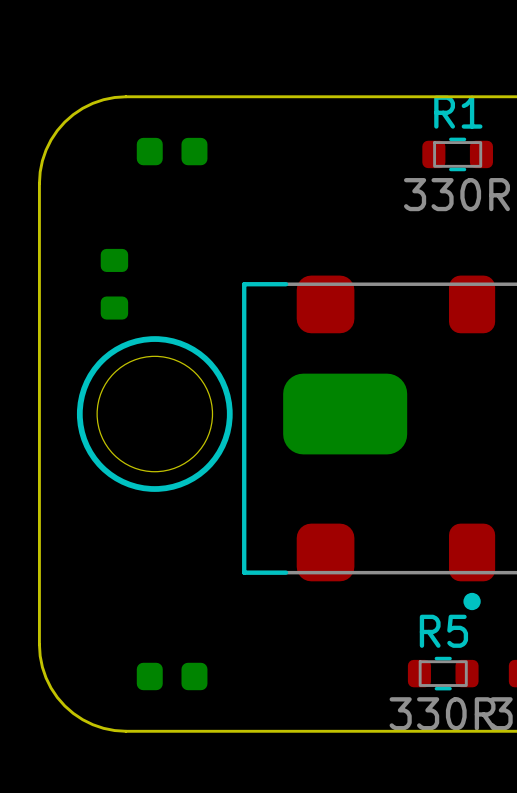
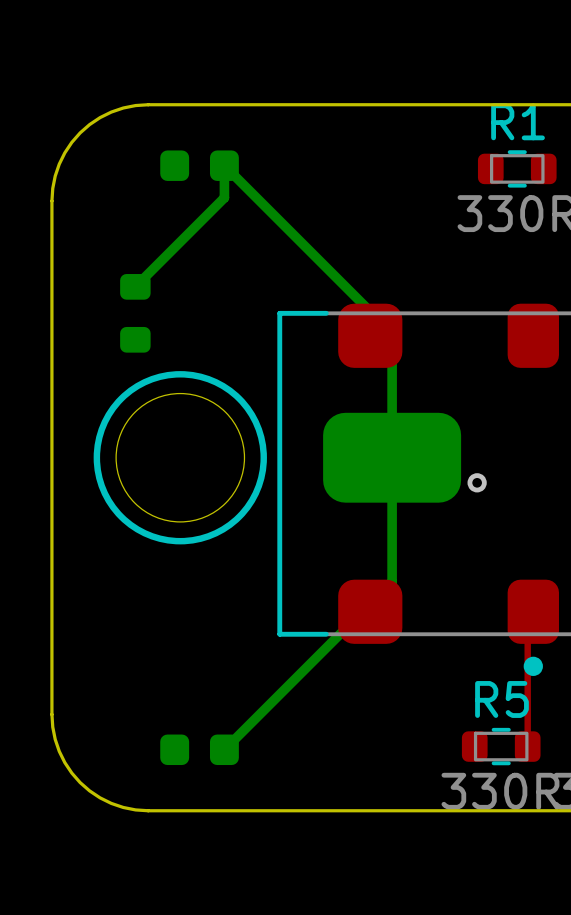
bottom track: none -> (135, 286) (224, 197) (224, 165) (392, 333) (392, 582) (224, 749)
via: none -> (477, 482)
top track: none -> (533, 611) (527, 617) (527, 746)

